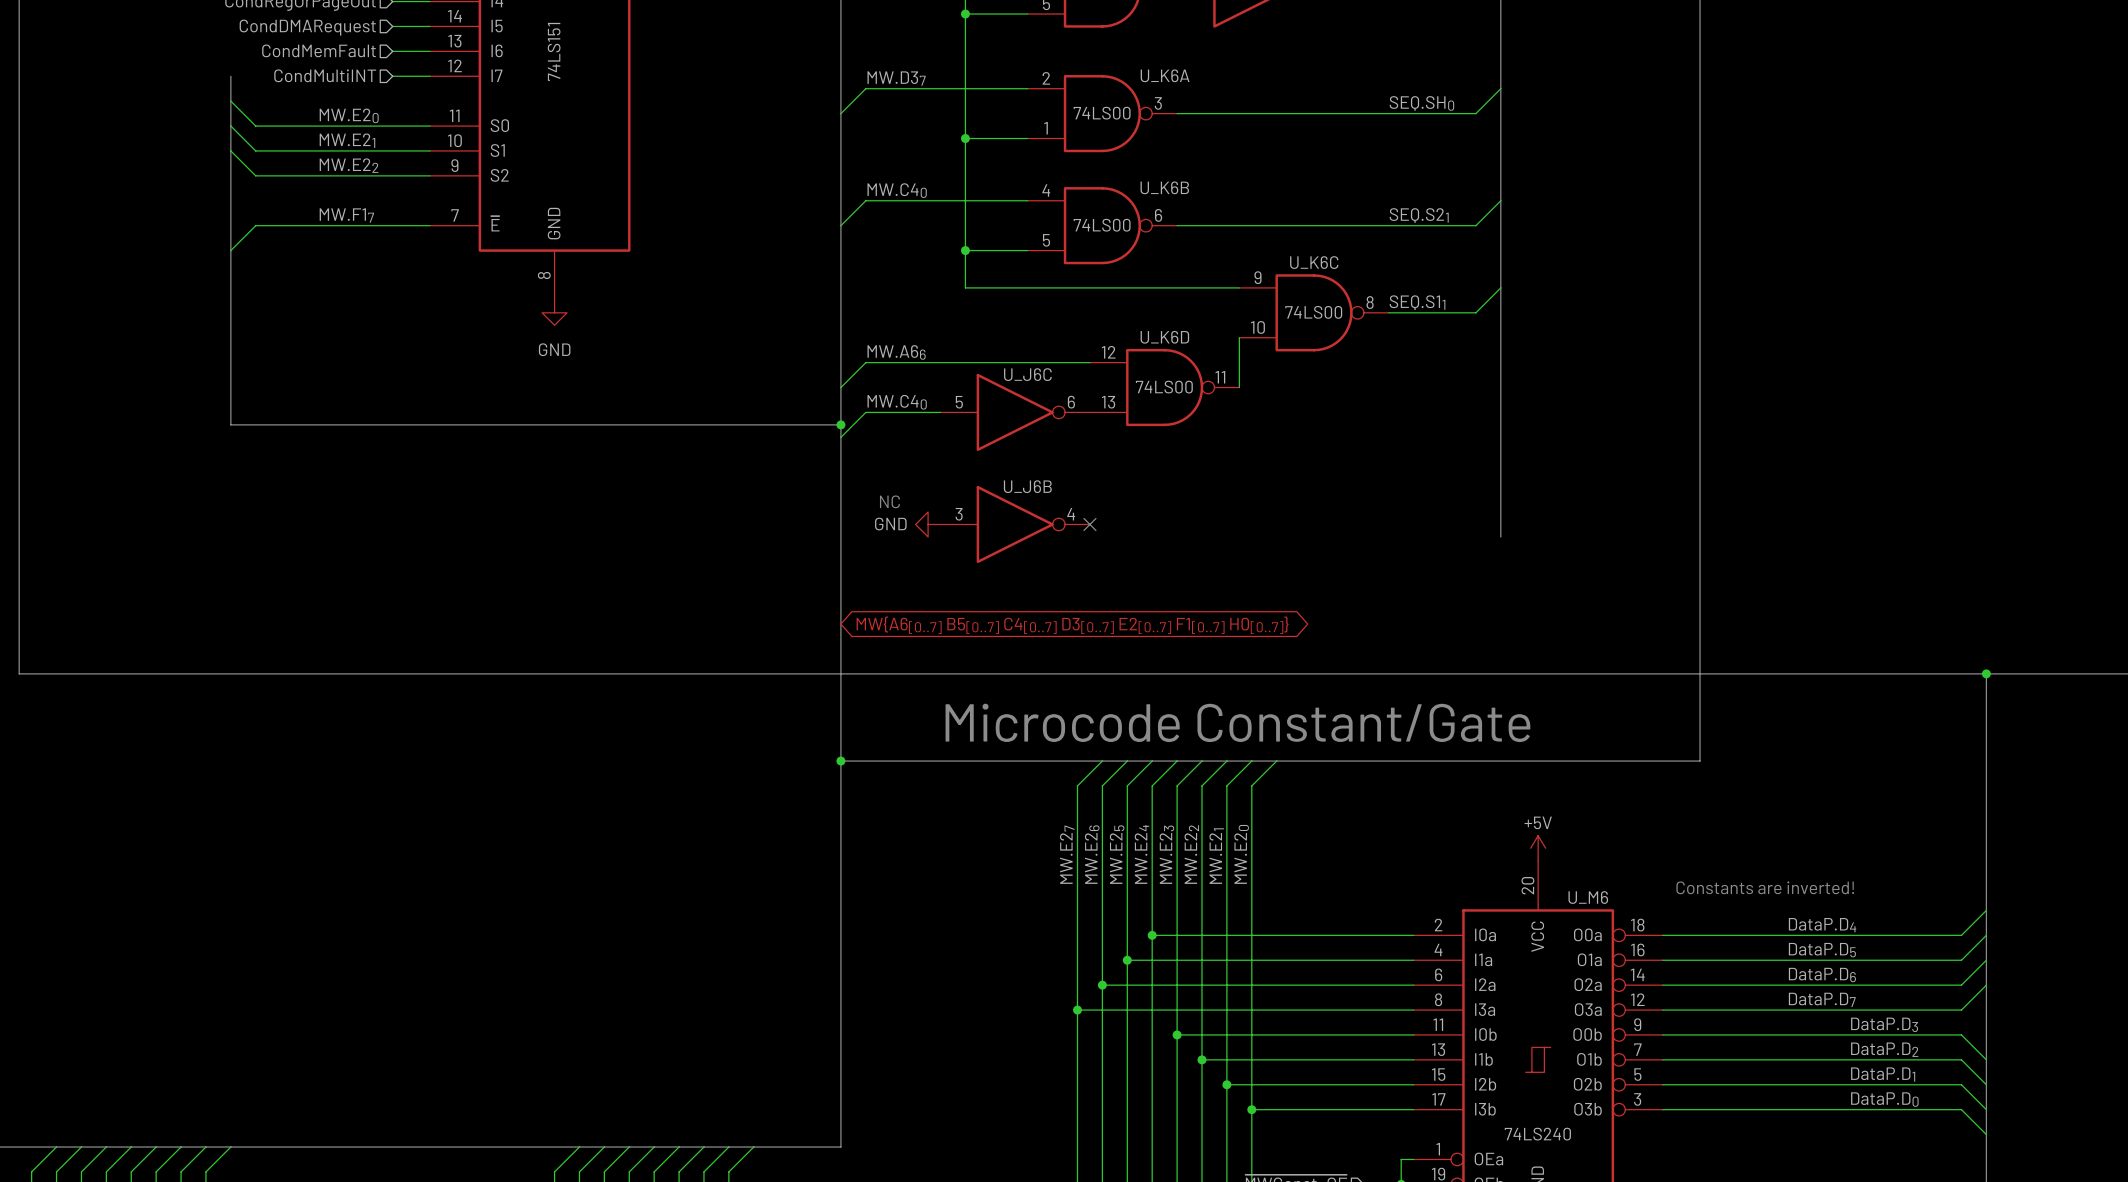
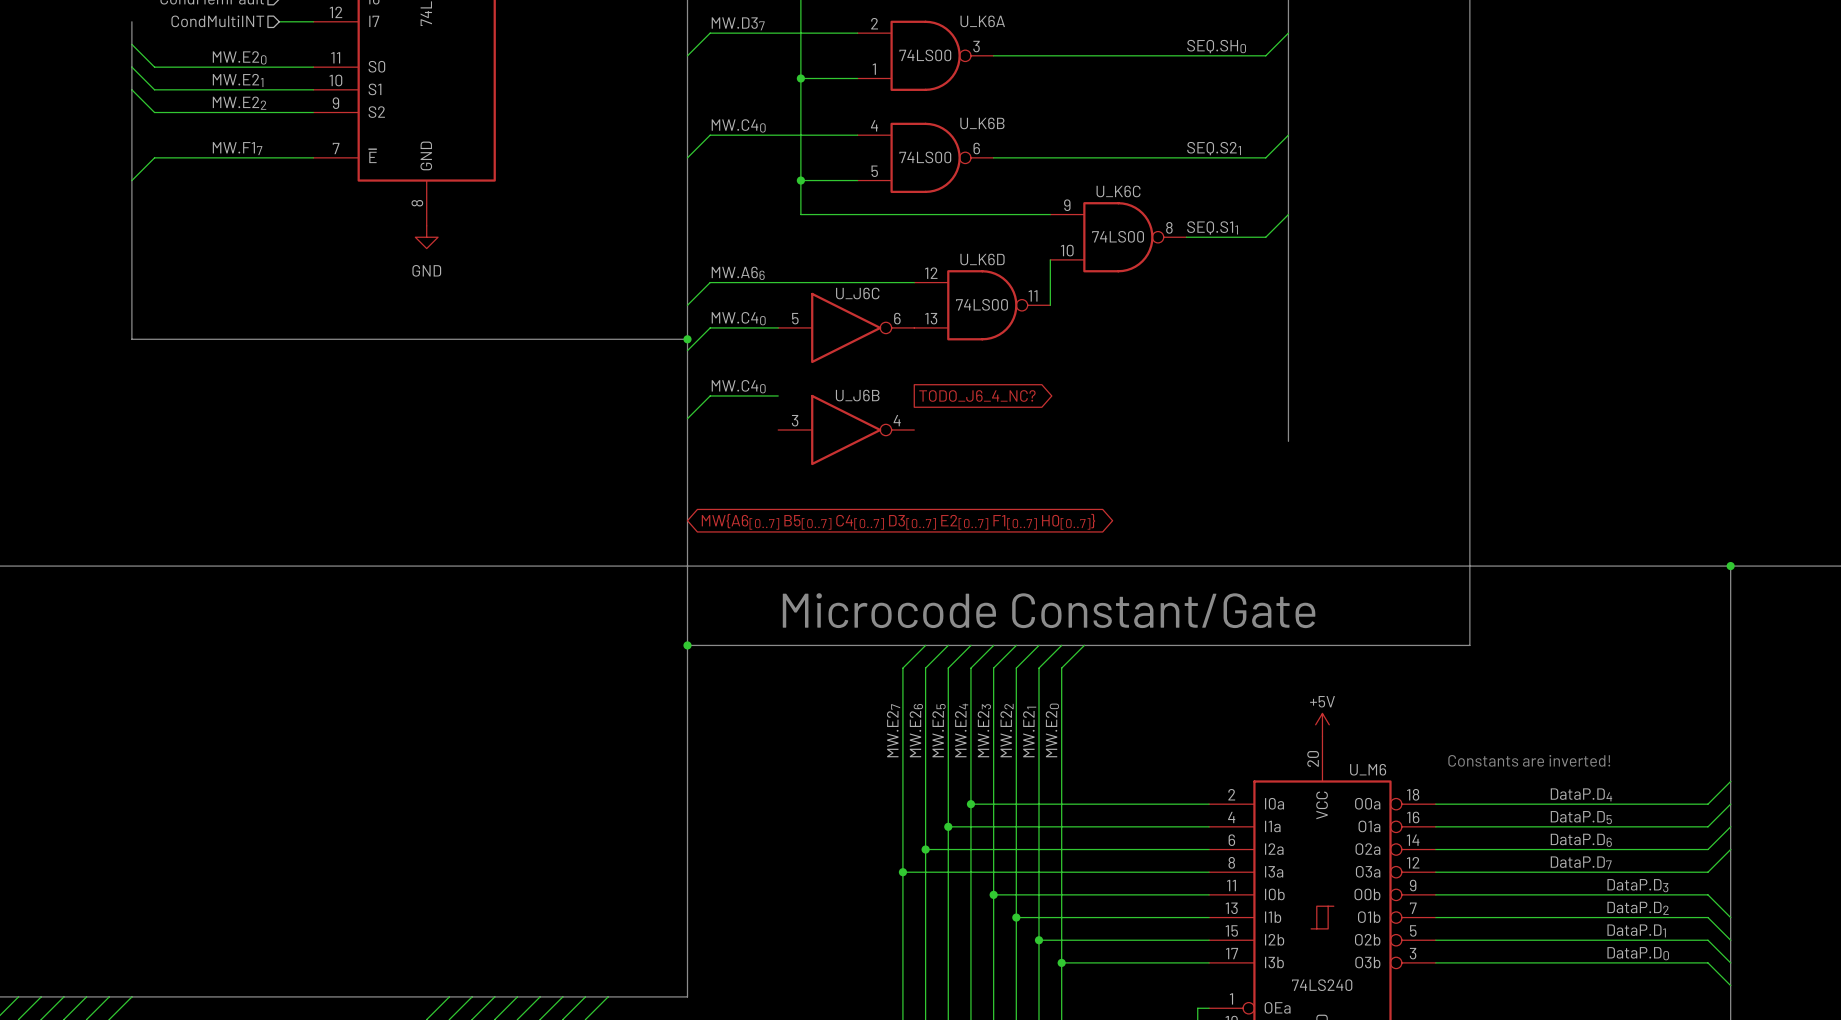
label: none -> MW.C40 (738, 386)
wire: none -> (778, 395) (710, 395) (687, 418)
global label: none -> TODO_J6_4_NC? (977, 395)
text: NC (889, 501) -> none
power symbol: GND (928, 524) -> none
no-connect mark: (1089, 524) -> none

